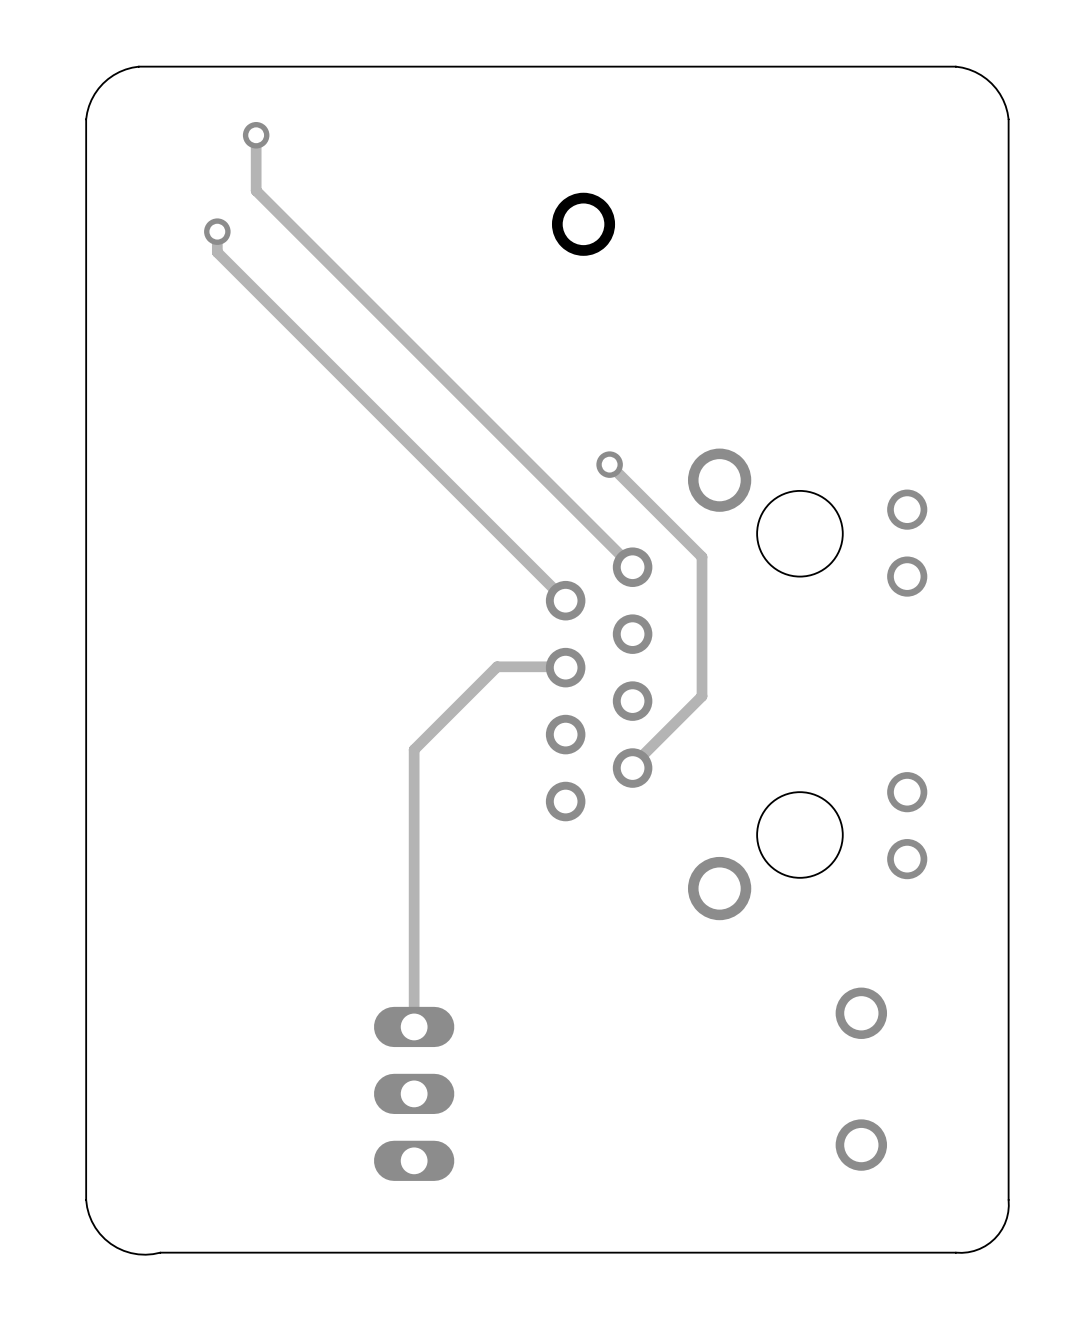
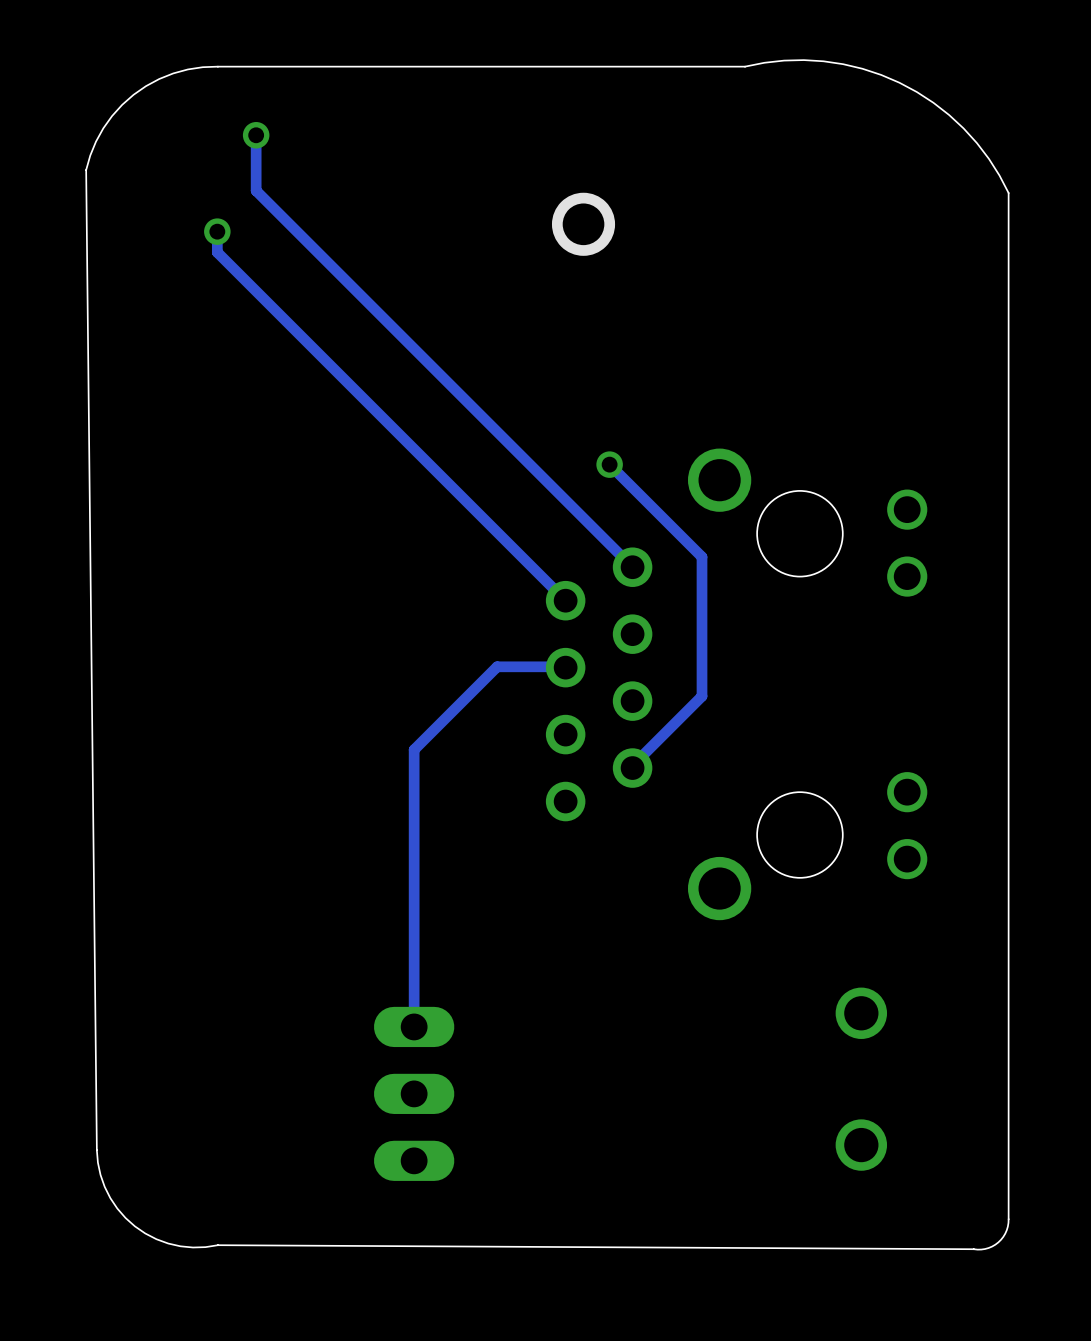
board edge: (217, 66) (138, 66) (125, 69) (113, 75) (98, 88) (88, 106) (86, 119) (86, 1199) (89, 1214) (95, 1227) (105, 1239) (117, 1247) (130, 1253) (145, 1254) (160, 1252) (961, 1252) (979, 1248) (990, 1242) (998, 1234) (1006, 1218) (1008, 1199) -> (217, 66) (187, 69) (173, 73) (145, 86) (133, 94) (112, 116) (103, 128) (90, 155) (86, 170) (96, 1150) (100, 1175) (104, 1186) (117, 1208) (134, 1226) (145, 1233) (168, 1243) (192, 1247) (217, 1245) (977, 1249) (992, 1246) (1003, 1236) (1008, 1222) (1008, 1199)
board edge: (745, 66) (955, 66) (975, 72) (986, 79) (996, 88) (1003, 99) (1007, 112) (1008, 193) -> (745, 66) (784, 60) (823, 61) (862, 68) (899, 82) (933, 102) (963, 128) (988, 158) (1008, 193)

